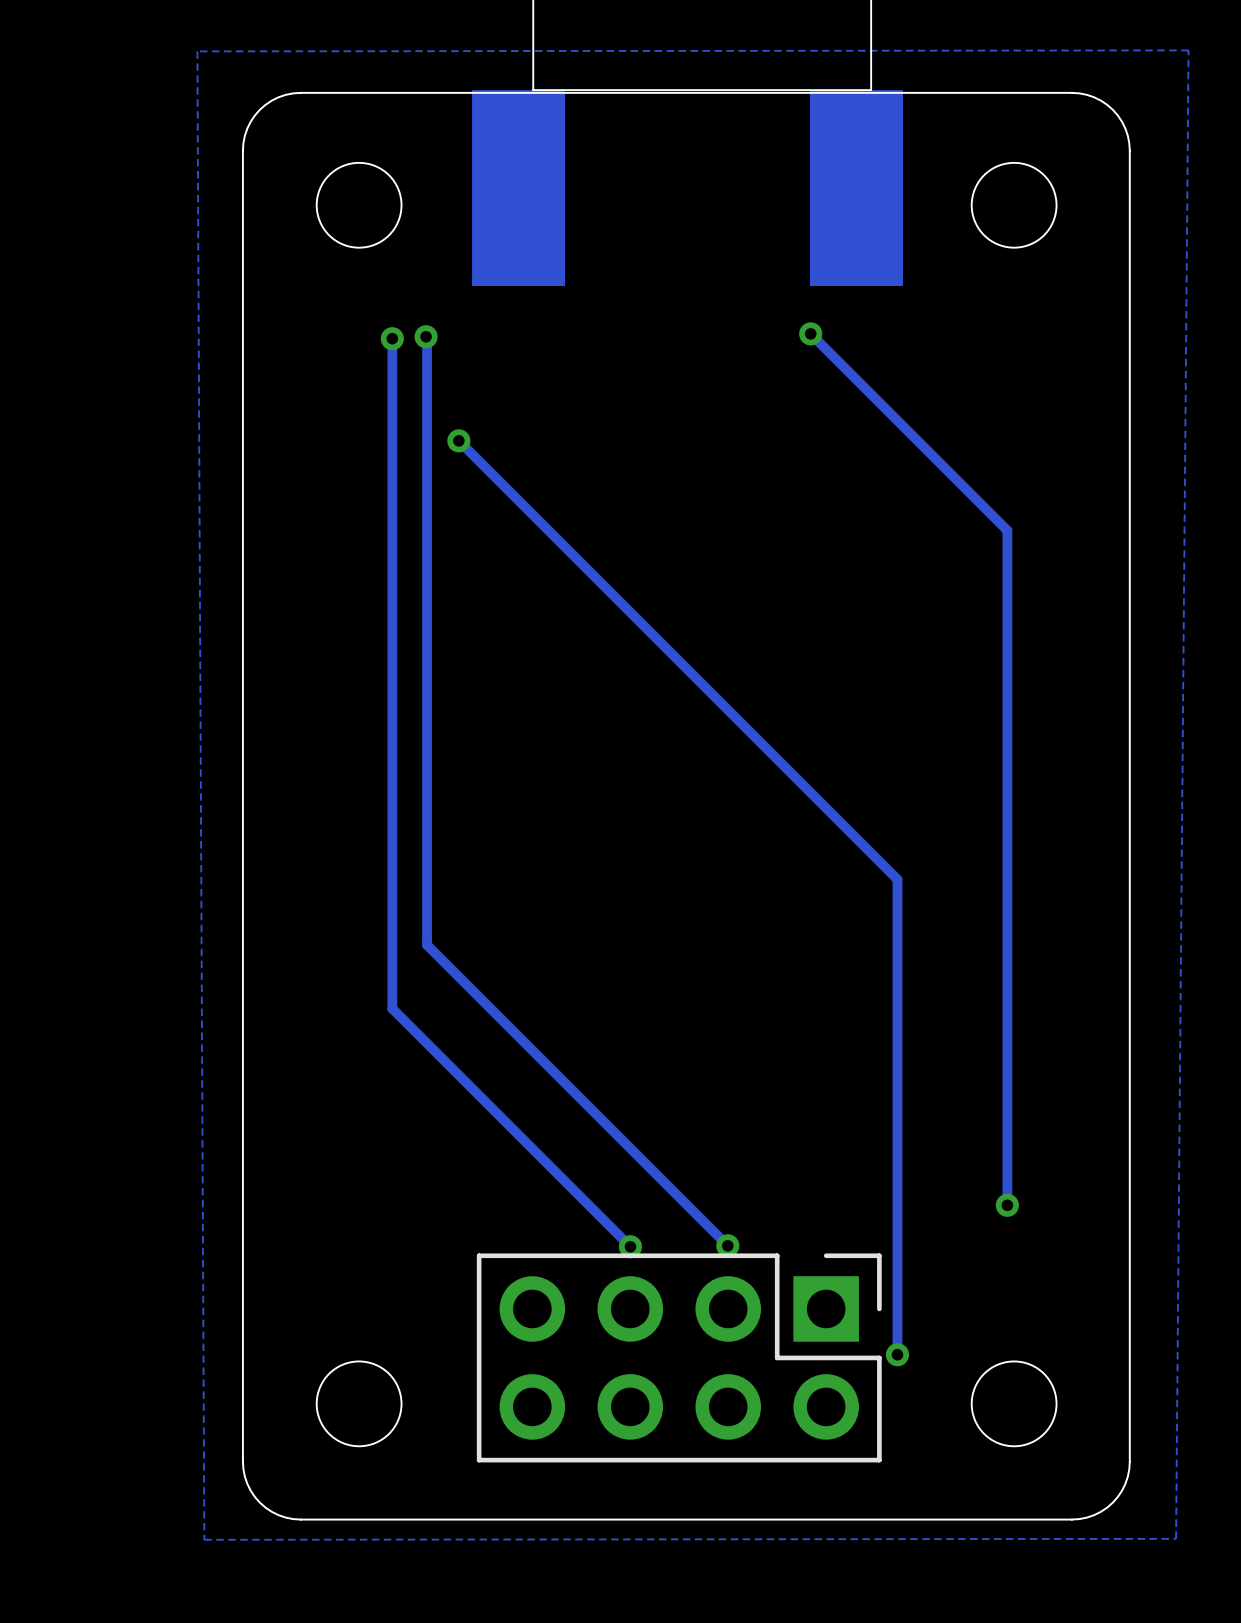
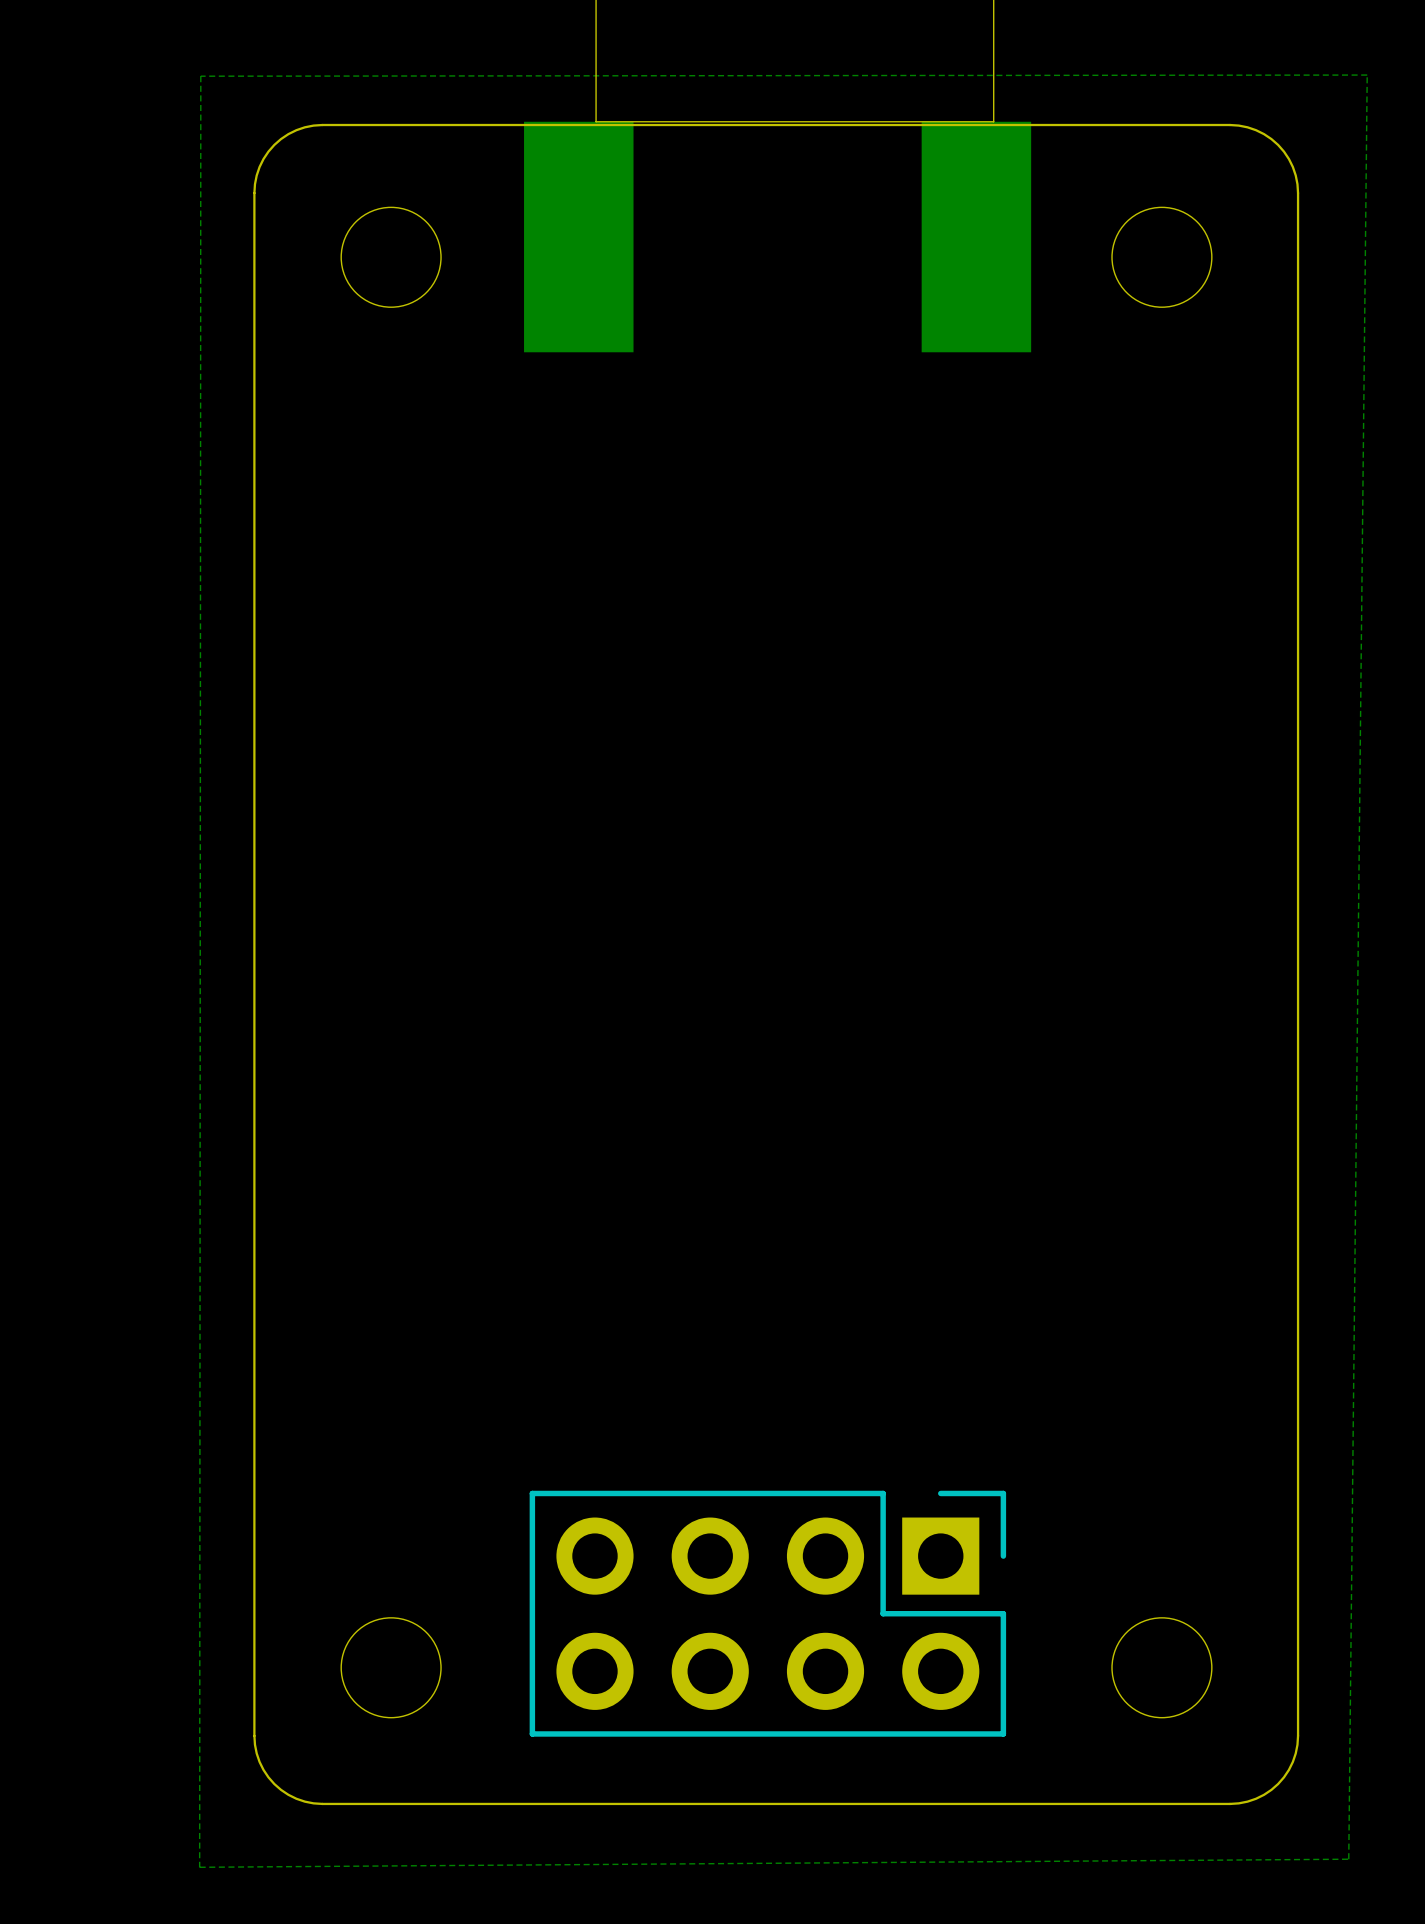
zone outline: (1188, 50) (1176, 1538) (204, 1539) (197, 51) -> (1367, 75) (1348, 1859) (199, 1867) (200, 76)
track: (810, 333) (1007, 530) (1007, 1205) -> none
via: (810, 333) -> none
track: (426, 336) (427, 945) (727, 1245) -> none
via: (426, 336) -> none
track: (392, 338) (392, 1008) (630, 1246) -> none
via: (392, 338) -> none
track: (458, 440) (897, 879) (897, 1354) -> none
via: (458, 440) -> none
via: (1007, 1205) -> none
via: (727, 1245) -> none
via: (630, 1246) -> none
via: (897, 1354) -> none

